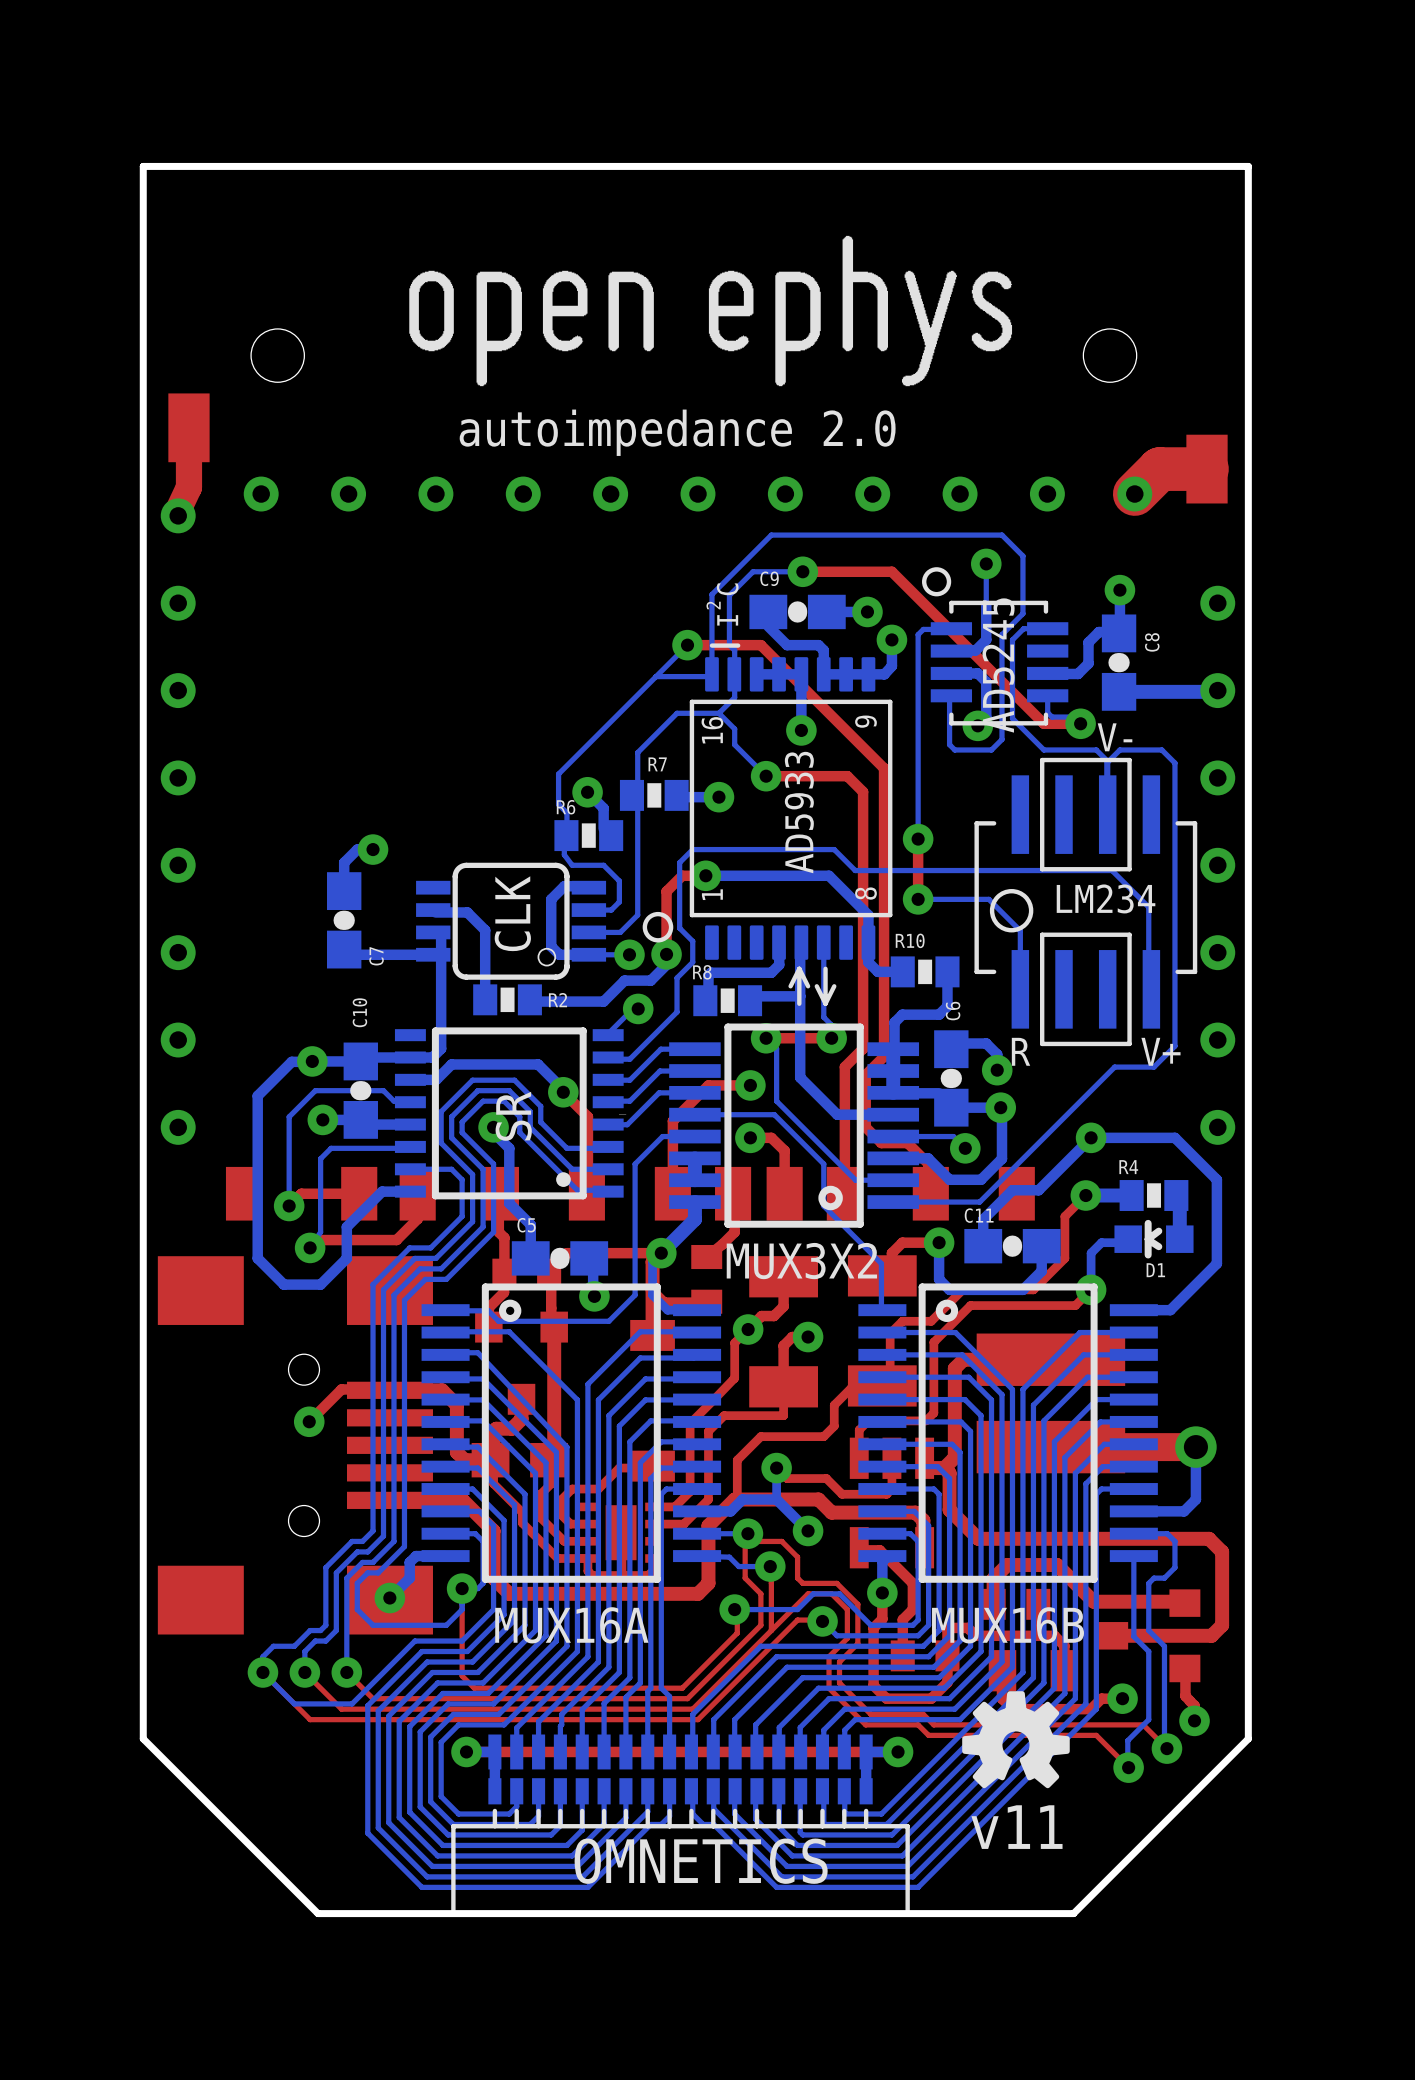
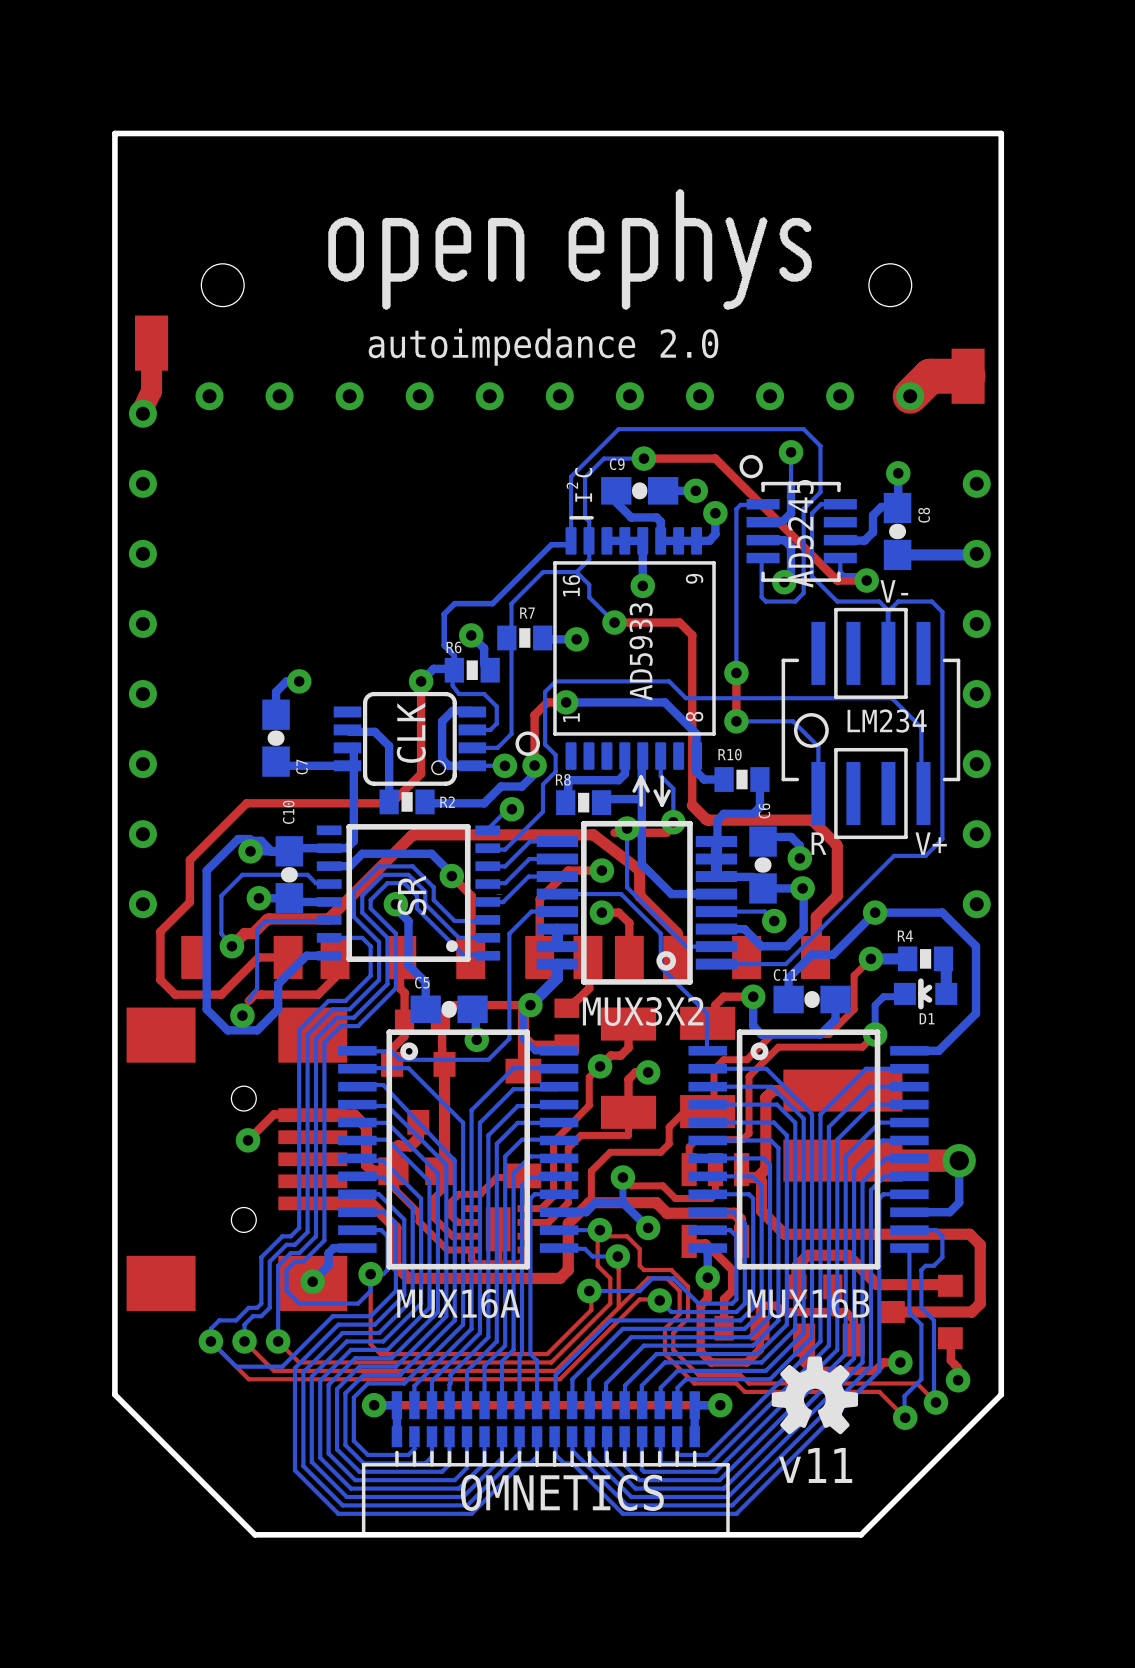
top track: (687, 645) (760, 645) (884, 768) (884, 1056) (865, 1074) (865, 1127) (881, 1143) (907, 1143) (928, 1164) (928, 1200) (930, 1193) -> none
bottom track: (687, 645) (558, 774) (558, 804) (566, 812) (566, 835) -> none
via: (687, 645) -> none
bottom track: (709, 676) (656, 676) -> (569, 542) (567, 544) (551, 544) (492, 603) (454, 603) (444, 614) (444, 645) (454, 655) (454, 670) (433, 668) (421, 681)
via: none -> (421, 681)
bottom track: (823, 967) (823, 1017) (831, 1025) (831, 1038) -> (660, 776) (673, 788) (673, 822)
top track: (863, 1004) (863, 1048) (844, 1066) (844, 1165) -> (692, 805) (707, 820) (812, 820) (836, 844) (837, 895) (816, 916) (815, 957)
bottom track: (766, 1038) (776, 1048) (776, 1101) (781, 1106) -> (627, 828) (627, 887)
via position: (766, 1038) -> (627, 828)
via position: (831, 1038) -> (673, 822)
bottom track: (311, 1061) (291, 1061) (257, 1095) -> (289, 851) (271, 851) (261, 840) (238, 839) (206, 870) (206, 879)
bottom track: (315, 1090) (289, 1116) (289, 1205) -> (252, 874) (242, 874) (221, 895) (221, 933) (231, 946)
top track: none -> (677, 935) (639, 895) (638, 869) (593, 834) (414, 834) (328, 918) (268, 919) (252, 933) (244, 933) (231, 946)
top track: (322, 1193) (301, 1193) (289, 1205) -> (258, 957) (221, 994) (175, 994) (160, 979) (160, 931) (189, 902) (189, 860) (246, 803) (391, 803) (421, 773) (421, 681)
via position: (289, 1205) -> (231, 946)
via position: (310, 1247) -> (242, 1015)

